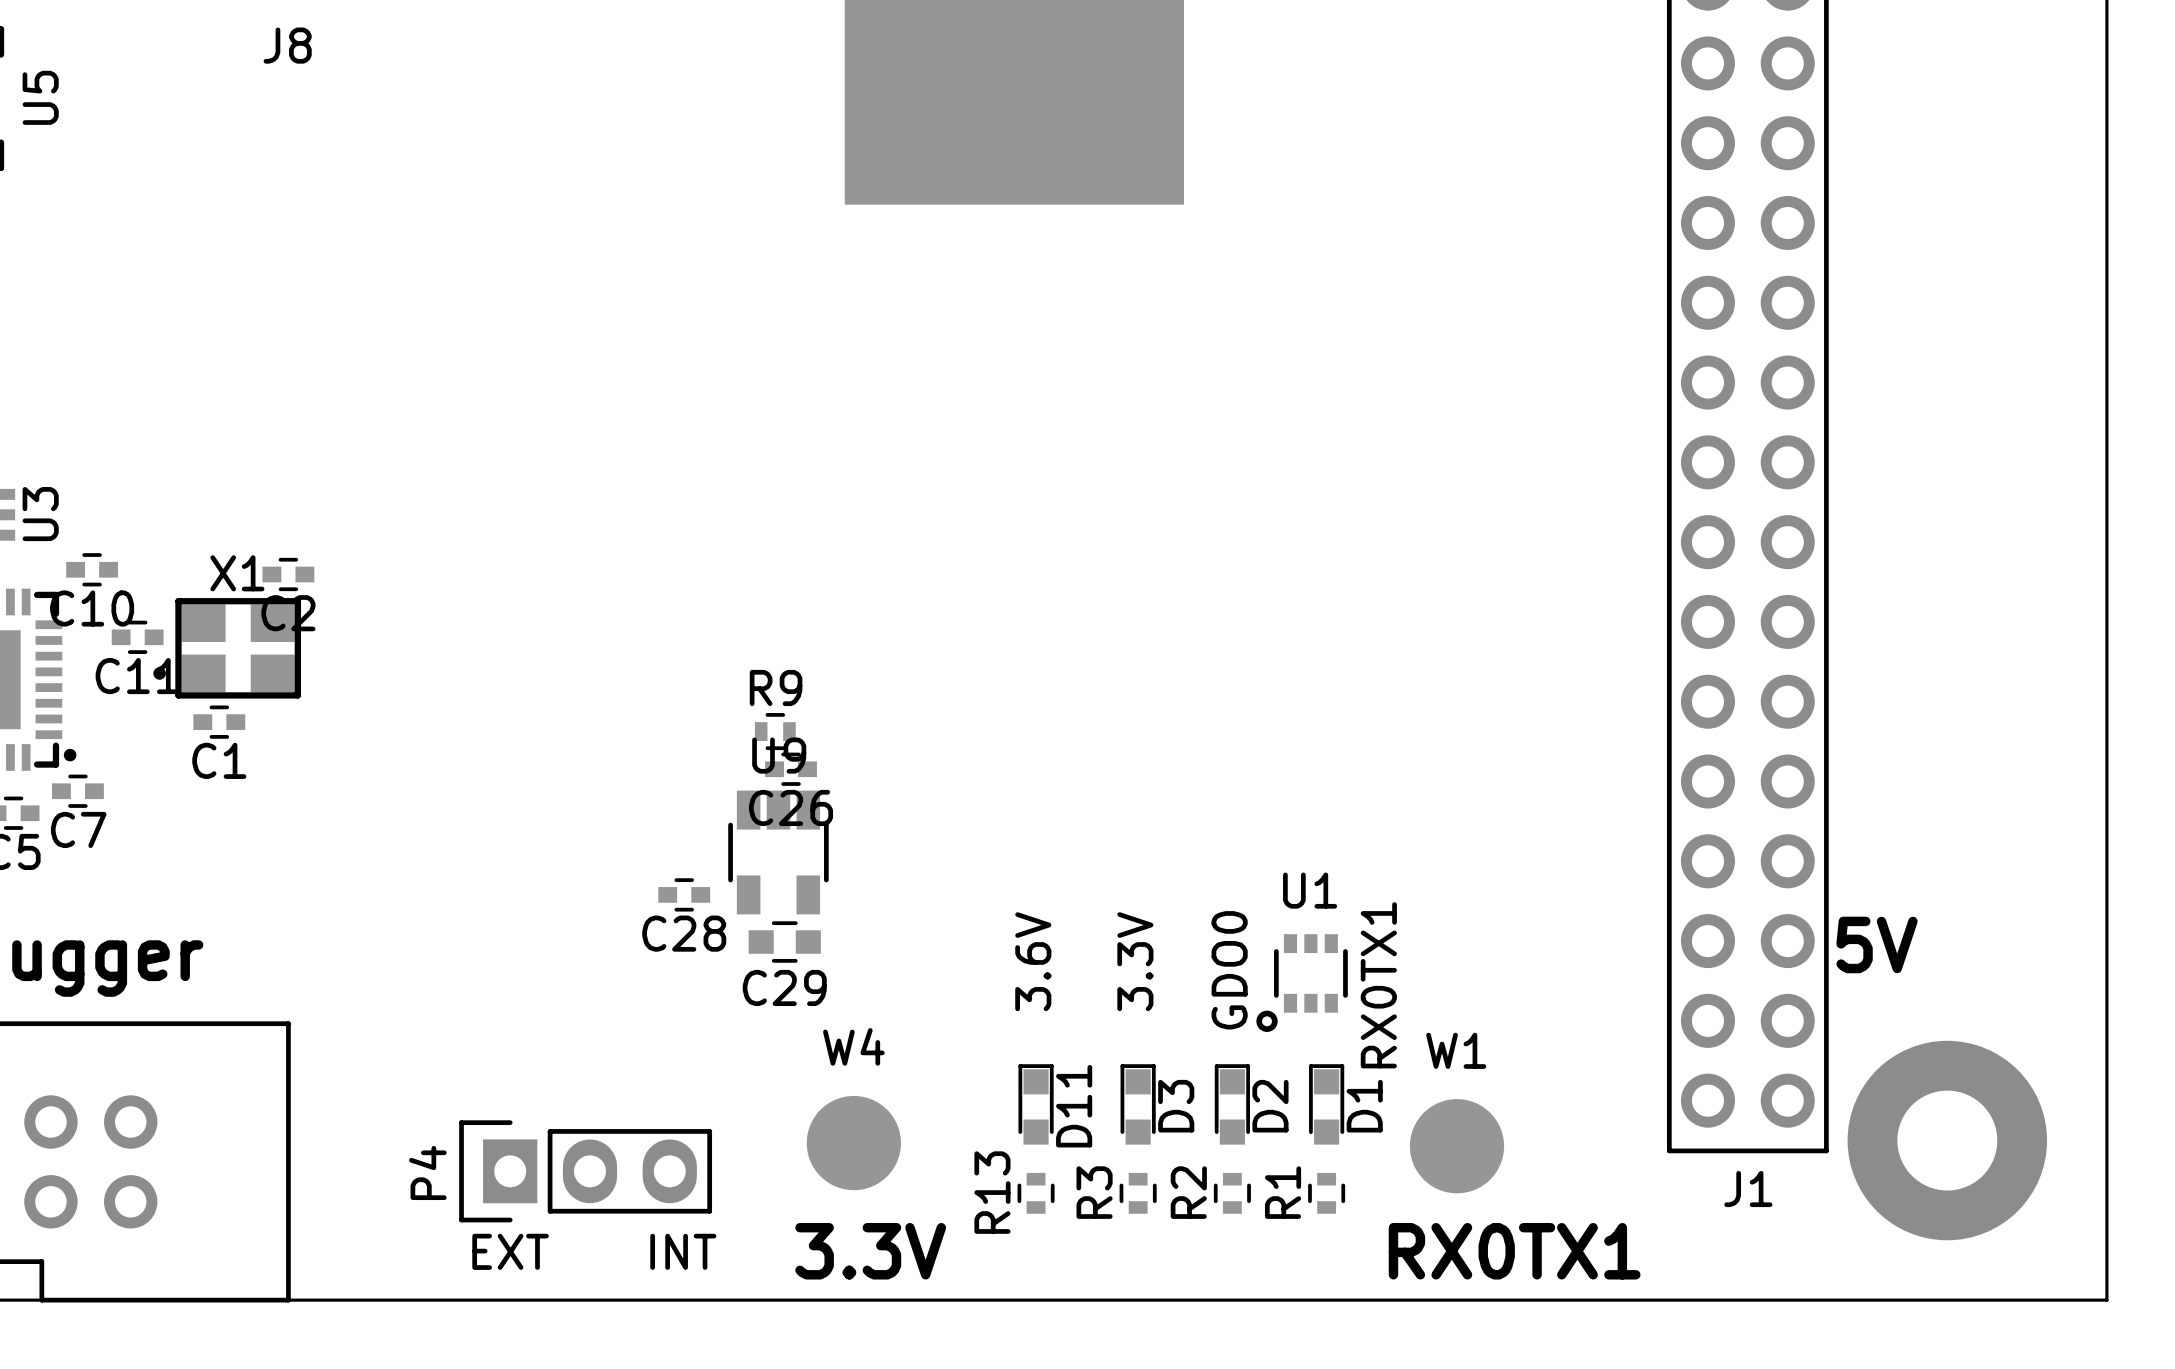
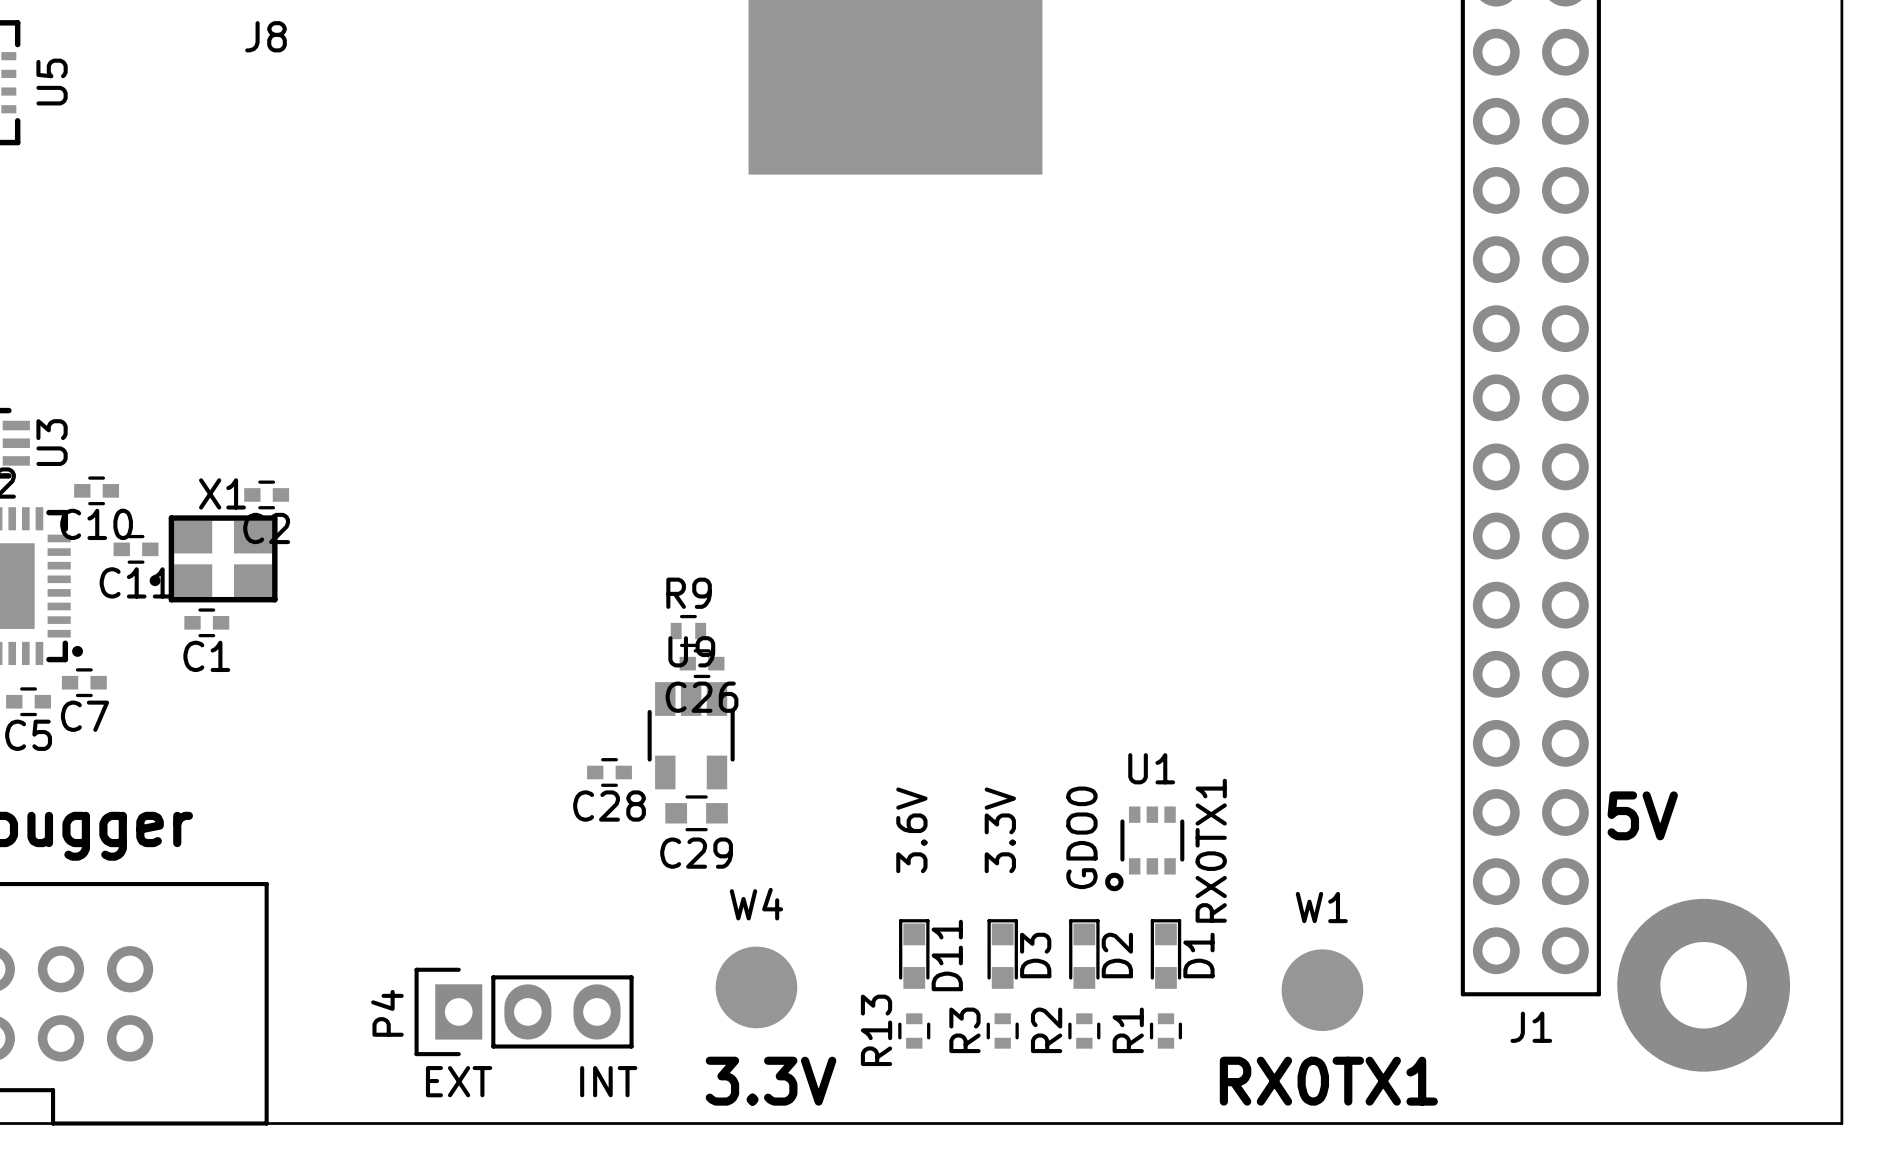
W1 position: (1456, 1146) -> (1322, 990)

